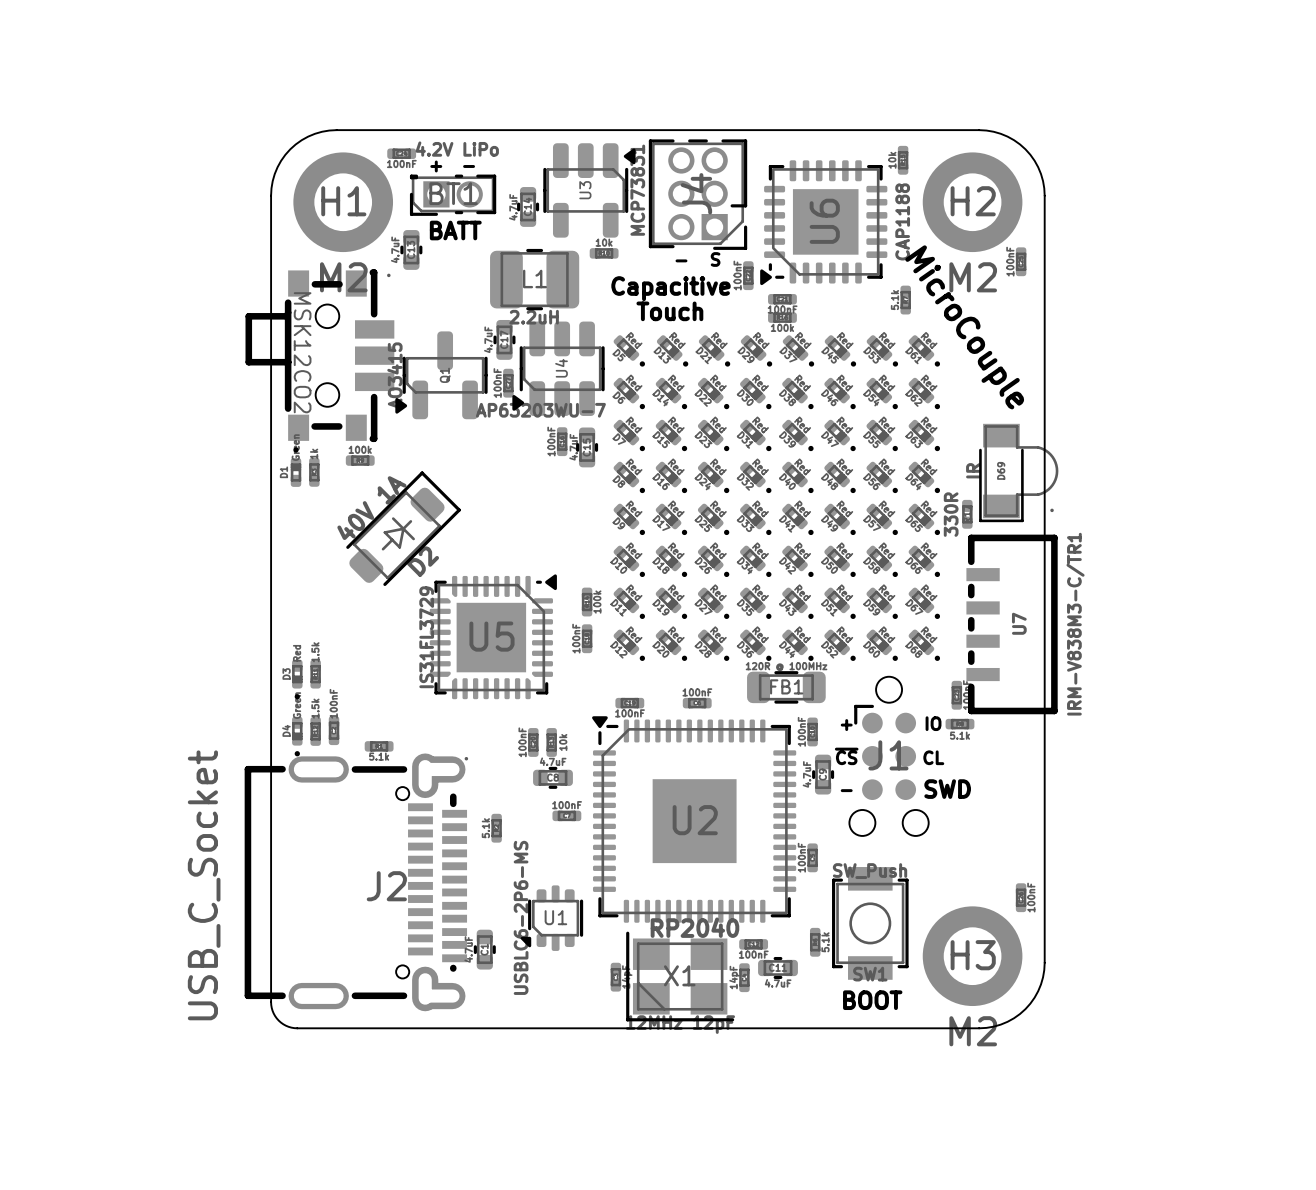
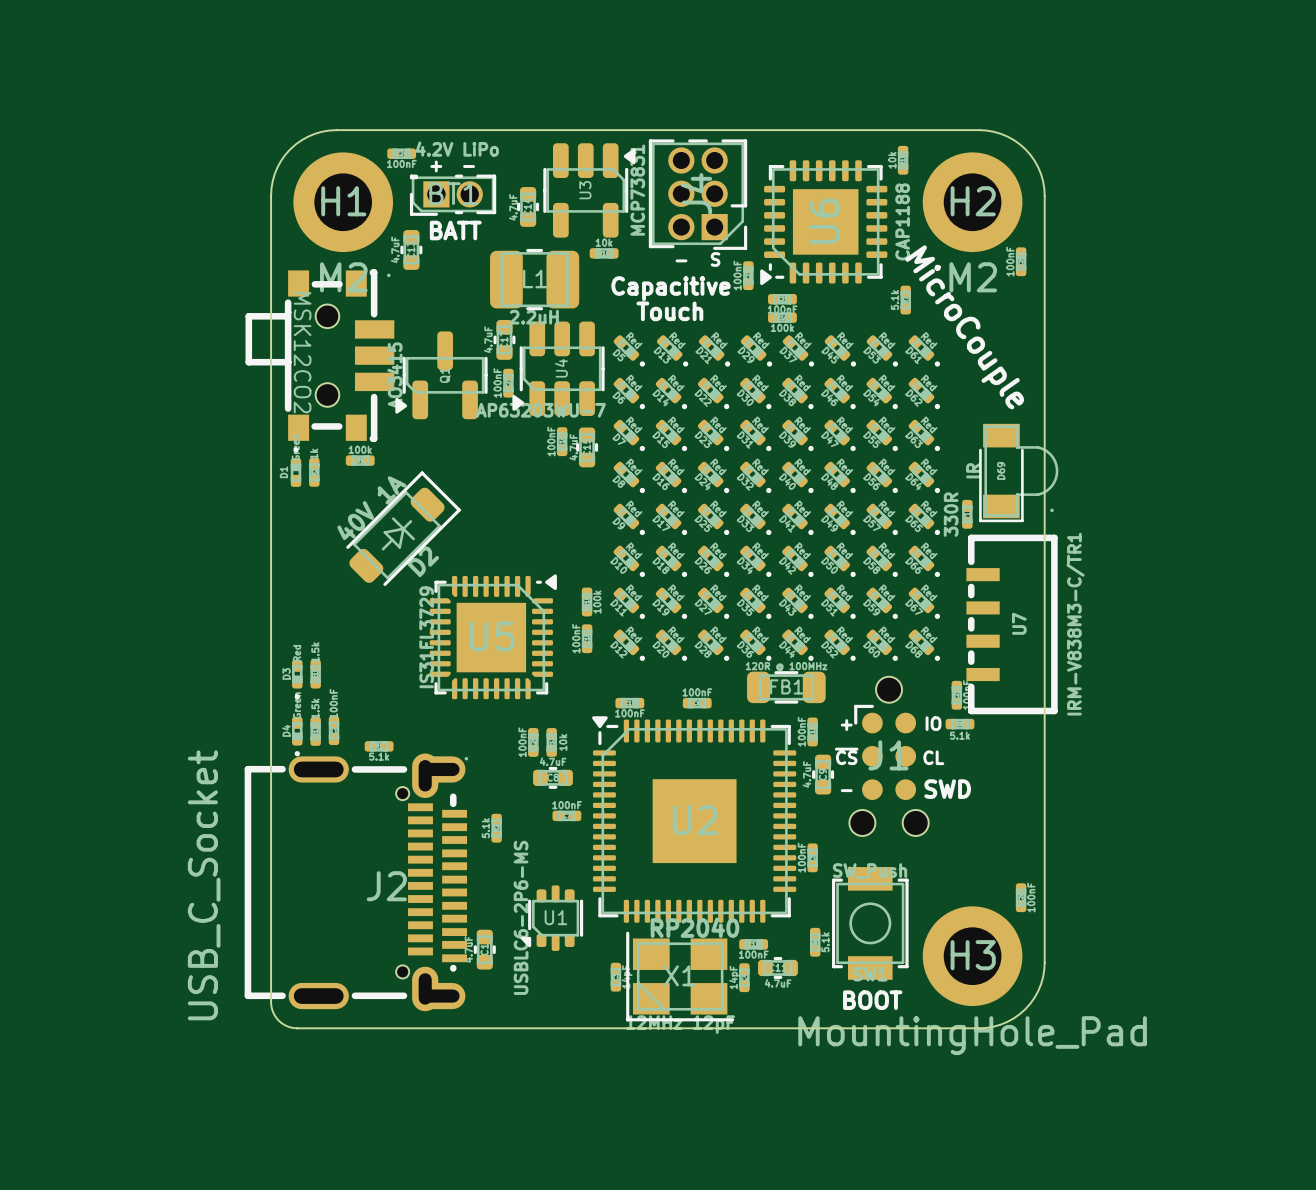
H3 value: M2 (973, 1031) -> MountingHole_Pad (972, 1035)

